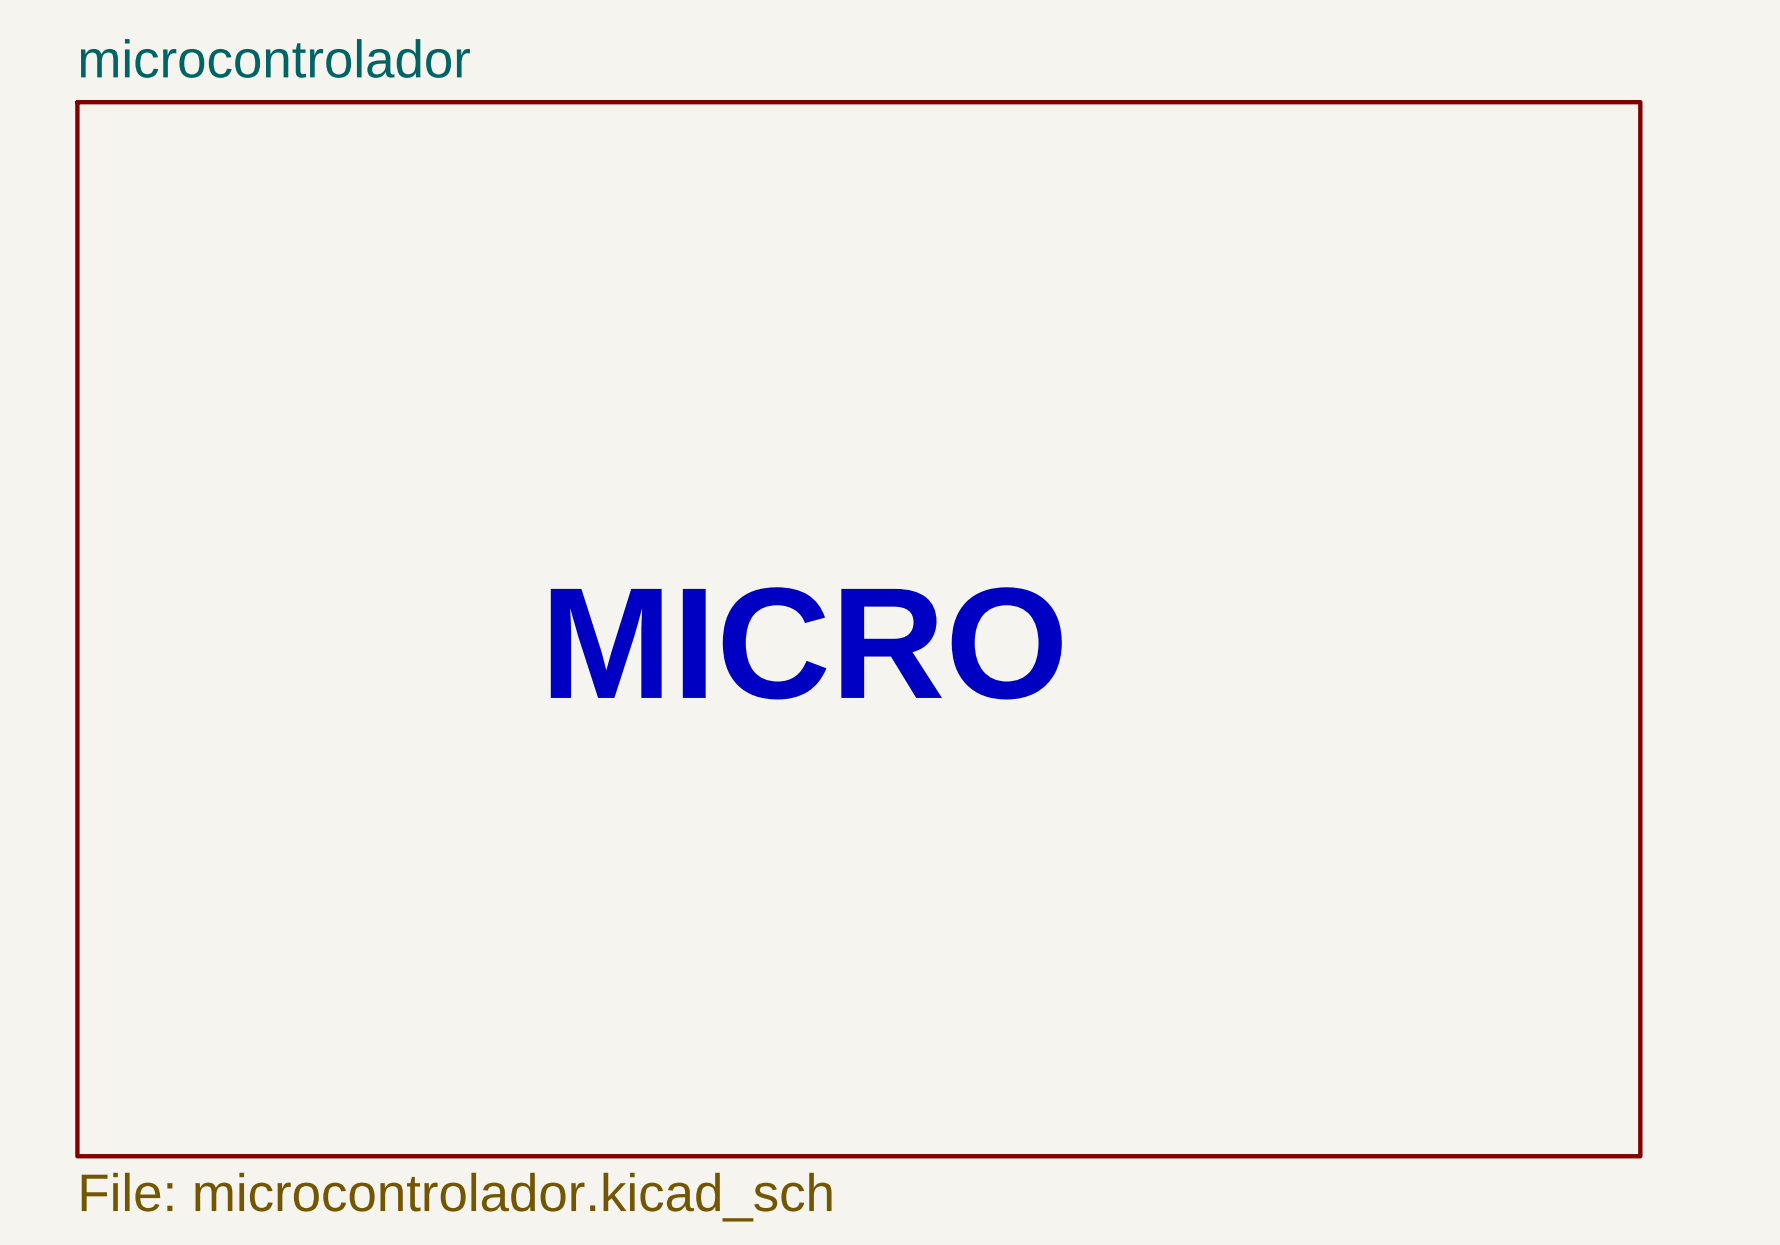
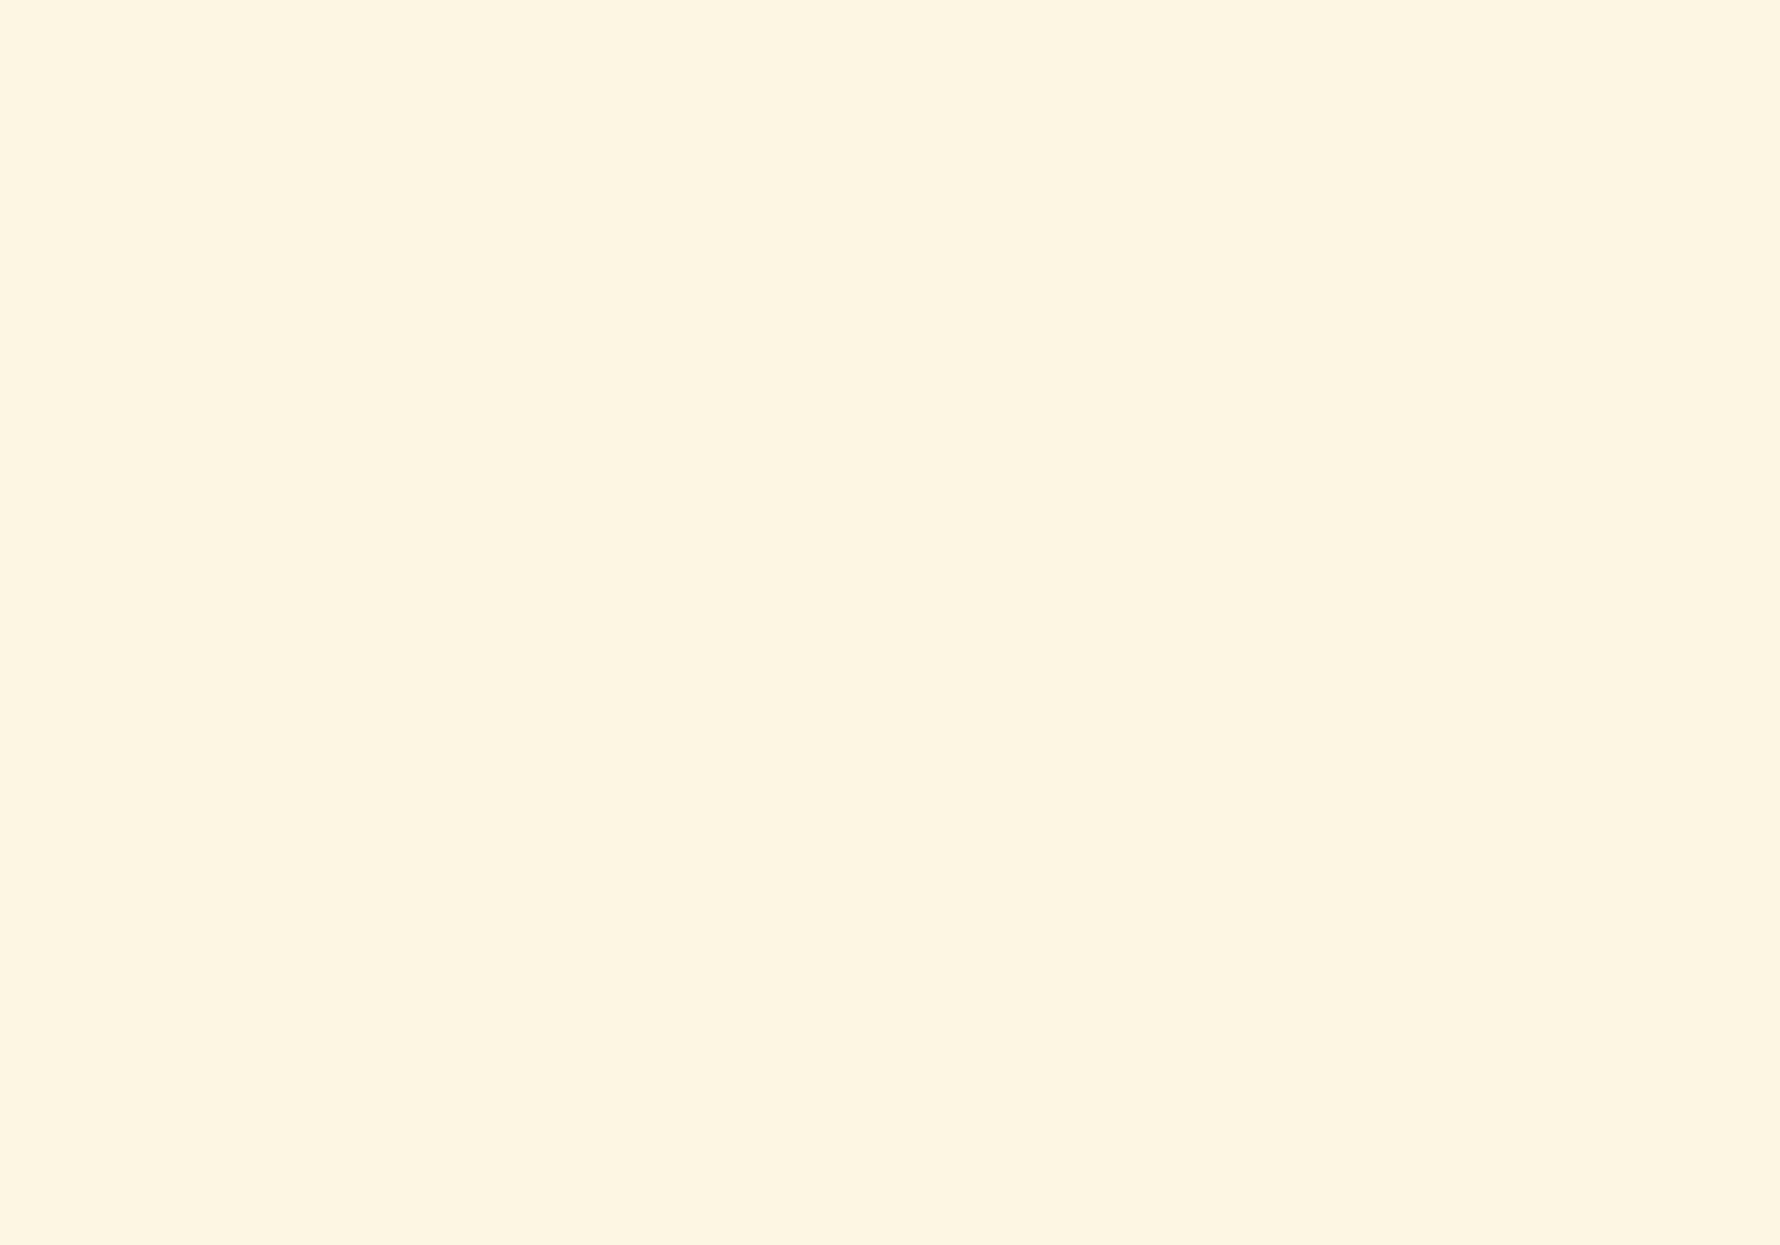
sheet microcontrolador: File: microcontrolador.kicad_sch (858, 629) -> none
text: MICRO (806, 643) -> none

